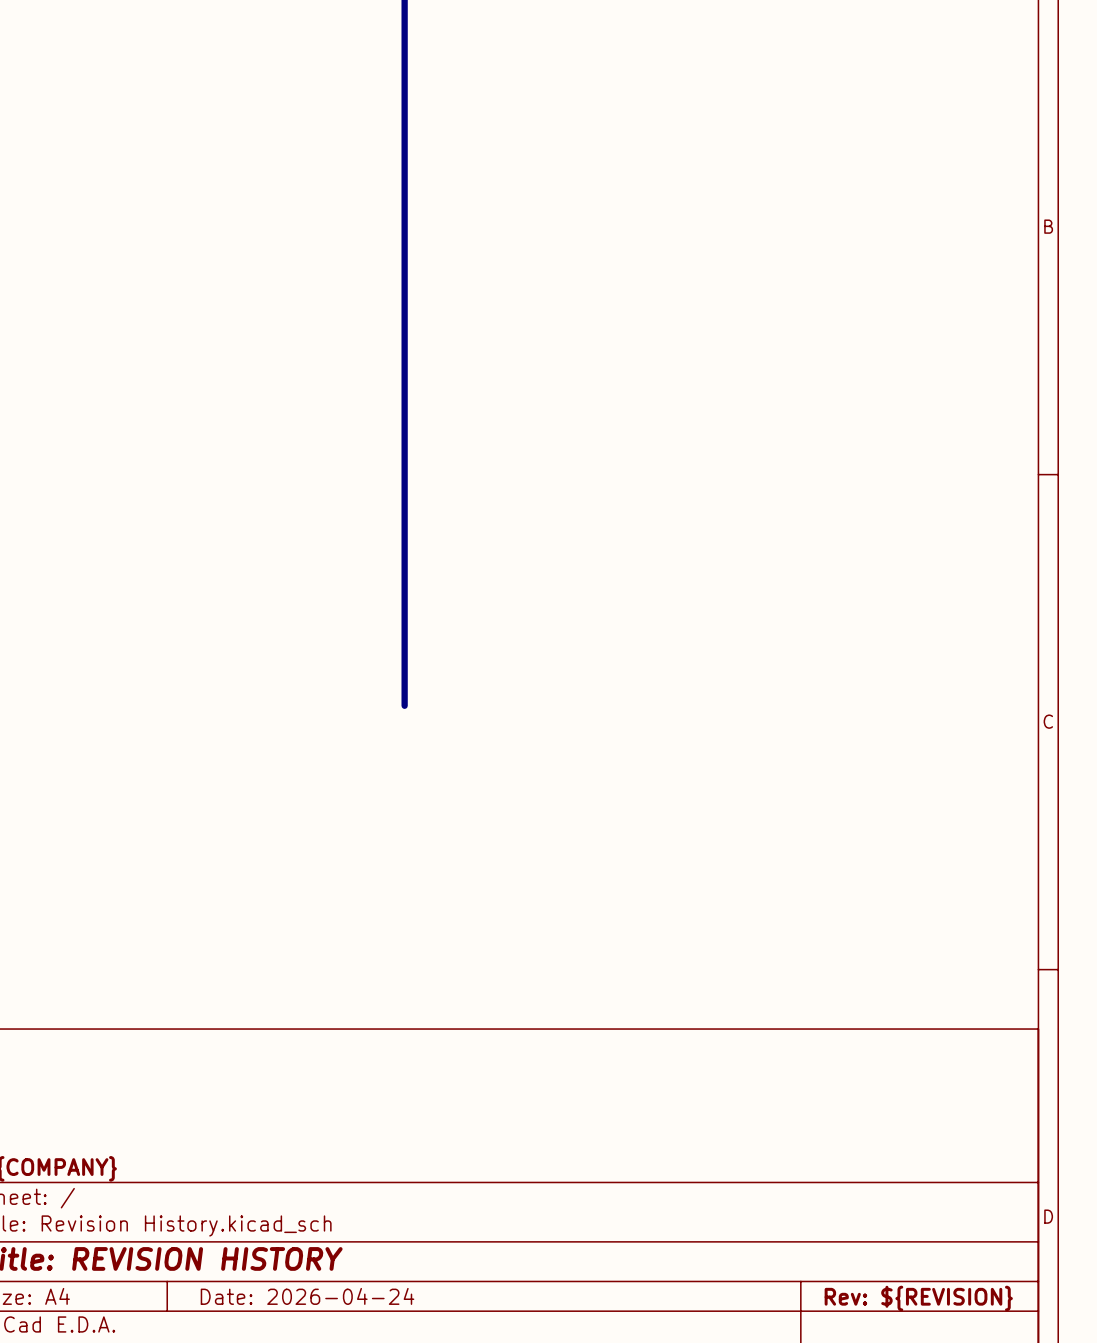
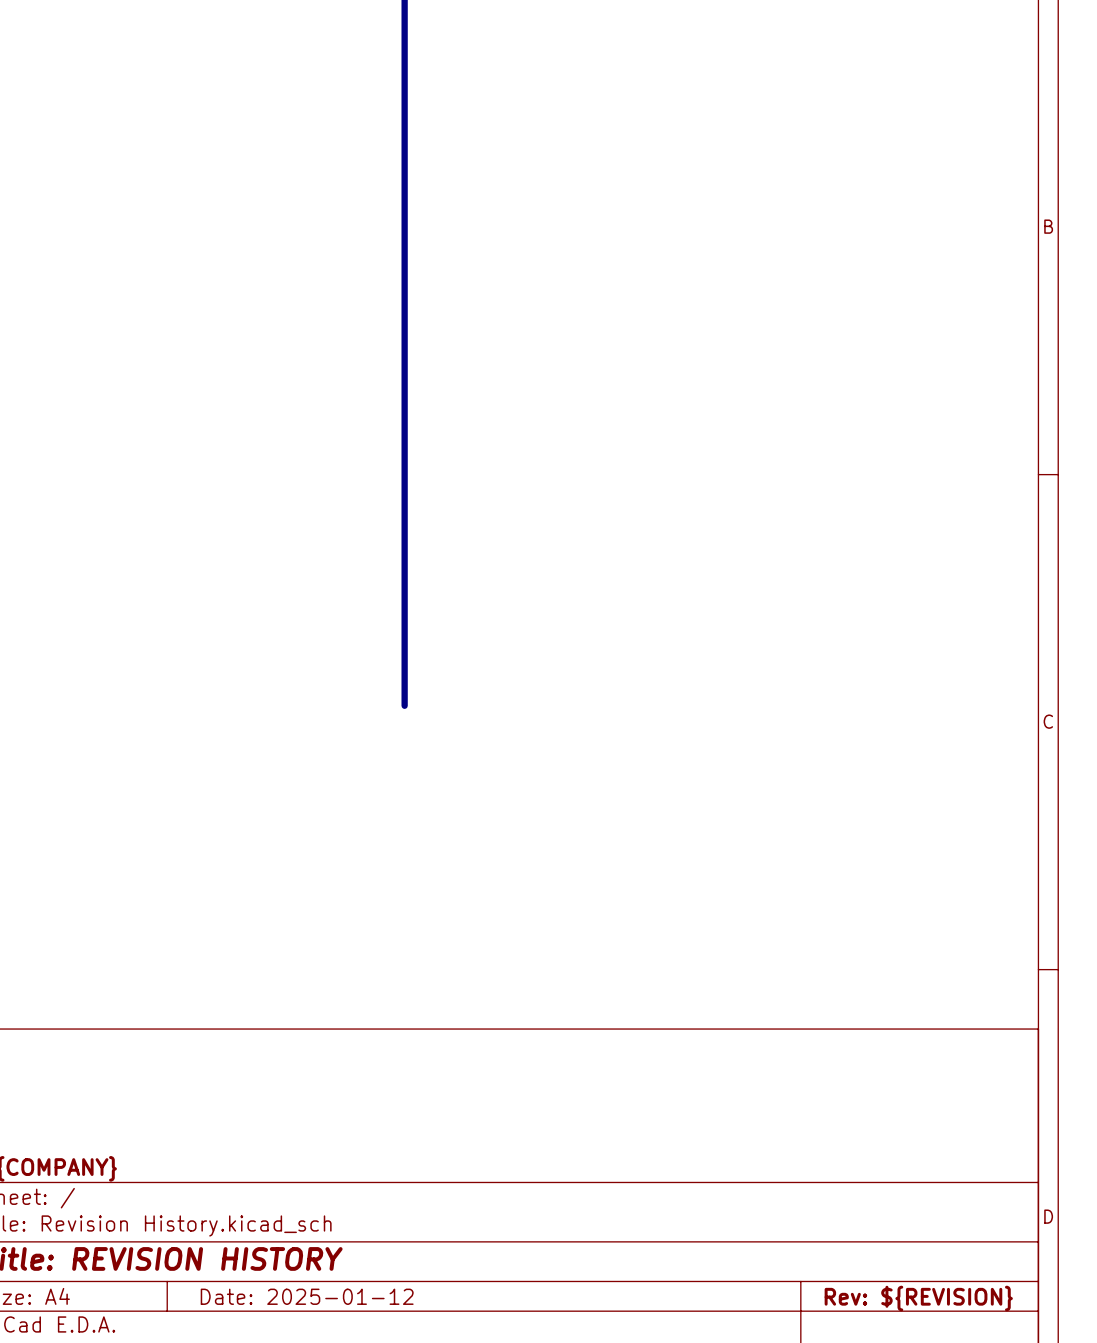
title block: Date: 2026-04-24 (307, 1296) -> Date: 2025-01-12 (307, 1296)

